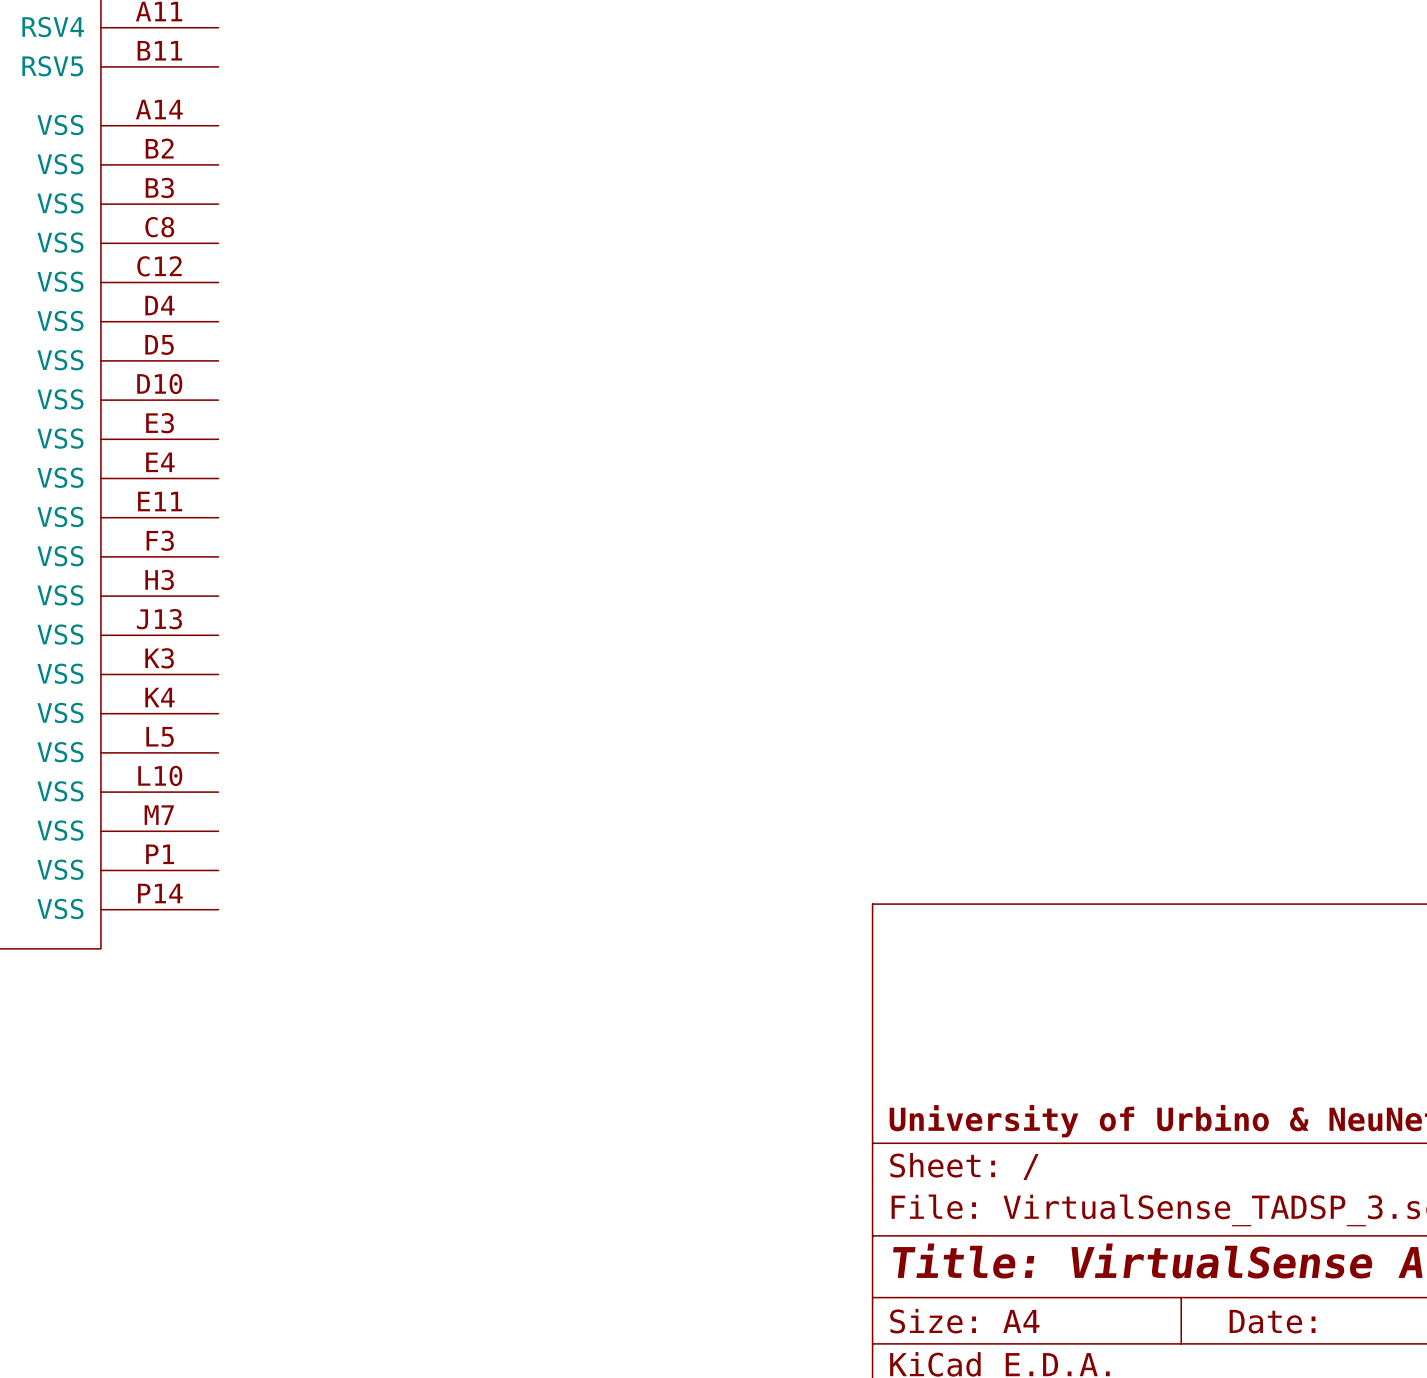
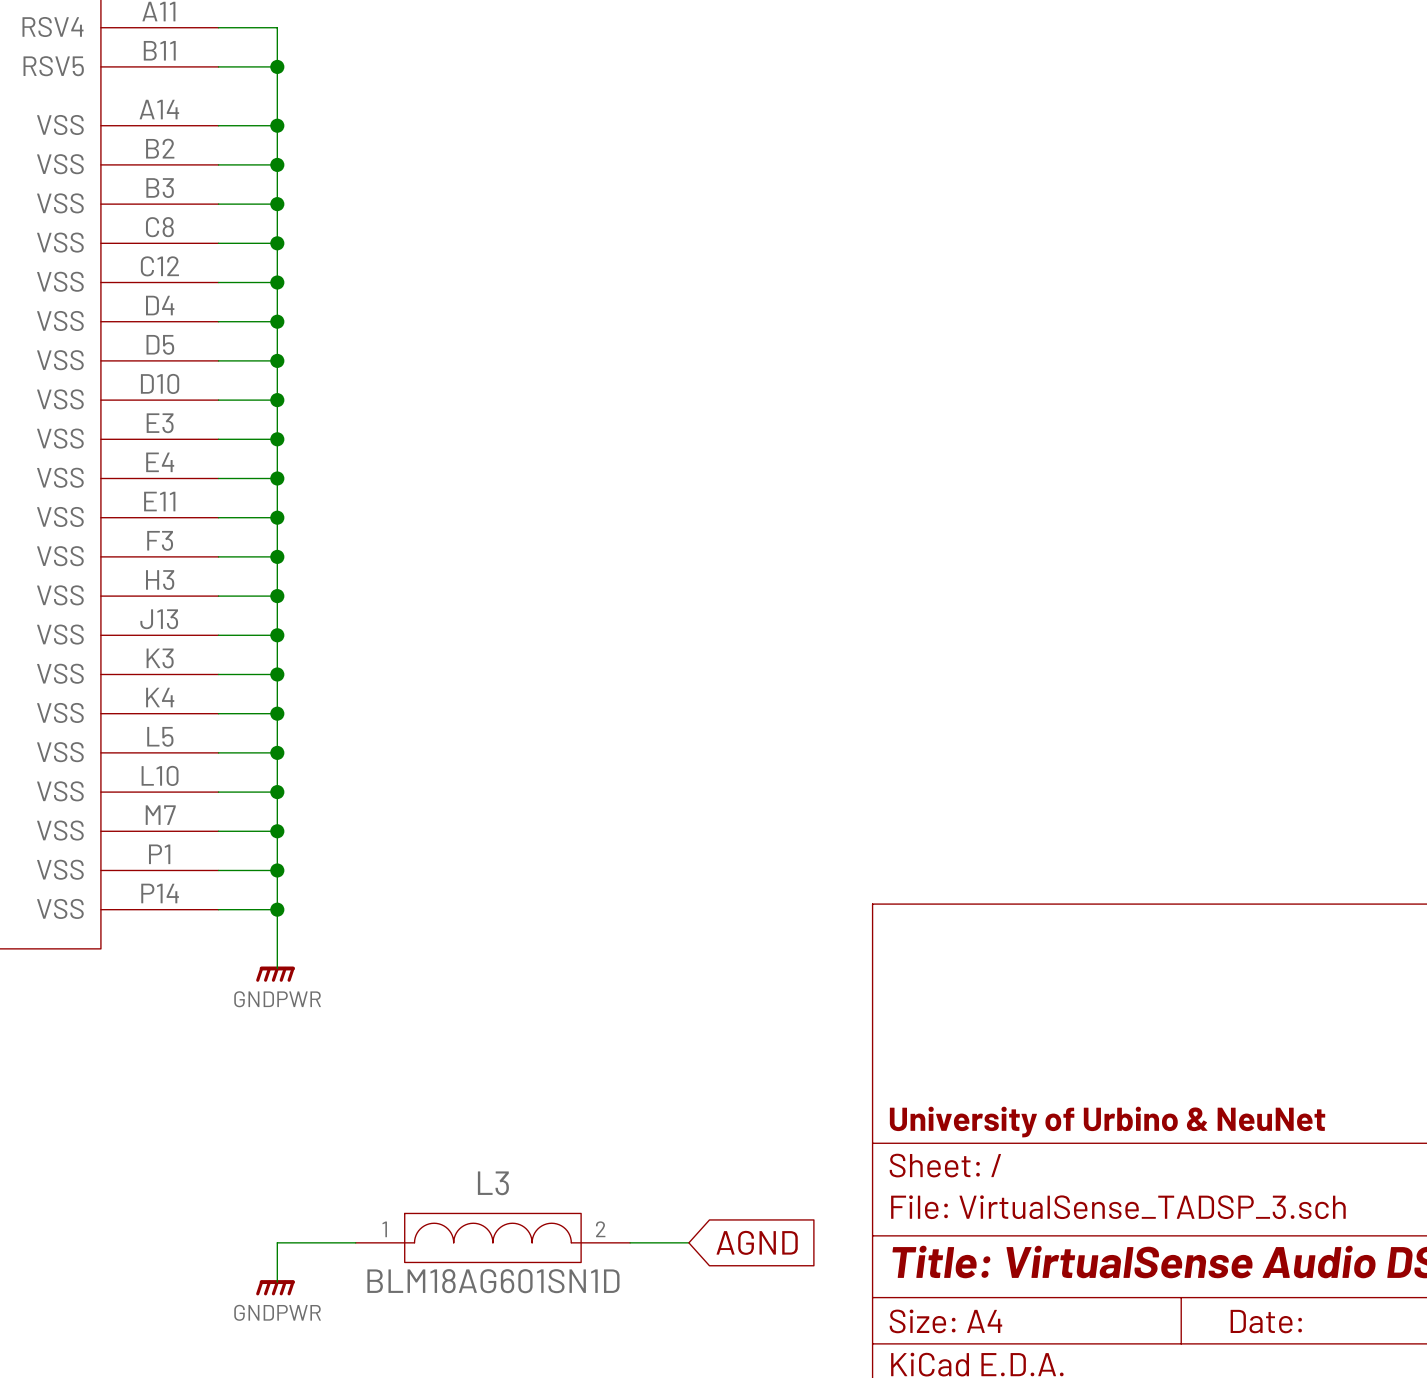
wire: none -> (218, 27) (277, 27) (277, 968)
wire: none -> (218, 66) (277, 66)
junction: none -> (277, 66)
wire: none -> (218, 125) (277, 125)
junction: none -> (277, 125)
wire: none -> (218, 164) (277, 164)
junction: none -> (277, 164)
wire: none -> (218, 204) (277, 204)
junction: none -> (277, 204)
wire: none -> (218, 243) (277, 243)
junction: none -> (277, 243)
wire: none -> (218, 282) (277, 282)
junction: none -> (277, 282)
wire: none -> (218, 321) (277, 321)
junction: none -> (277, 321)
wire: none -> (218, 360) (277, 360)
junction: none -> (277, 360)
wire: none -> (218, 400) (277, 400)
junction: none -> (277, 400)
wire: none -> (218, 439) (277, 439)
junction: none -> (277, 439)
wire: none -> (218, 478) (277, 478)
junction: none -> (277, 478)
wire: none -> (218, 517) (277, 517)
junction: none -> (277, 517)
wire: none -> (218, 556) (277, 556)
junction: none -> (277, 556)
wire: none -> (218, 596) (277, 596)
junction: none -> (277, 596)
wire: none -> (218, 635) (277, 635)
junction: none -> (277, 635)
wire: none -> (218, 674) (277, 674)
junction: none -> (277, 674)
wire: none -> (218, 713) (277, 713)
junction: none -> (277, 713)
wire: none -> (218, 752) (277, 752)
junction: none -> (277, 752)
wire: none -> (218, 792) (277, 792)
junction: none -> (277, 792)
wire: none -> (218, 831) (277, 831)
junction: none -> (277, 831)
wire: none -> (218, 870) (277, 870)
junction: none -> (277, 870)
wire: none -> (218, 909) (277, 909)
junction: none -> (277, 909)
power symbol: none -> GNDPWR (275, 974)
L3: none -> BLM18AG601SN1D (492, 1237)
wire: none -> (355, 1242) (277, 1242) (277, 1282)
wire: none -> (630, 1242) (688, 1242)
global label: none -> AGND (757, 1242)
power symbol: none -> GNDPWR (275, 1287)

